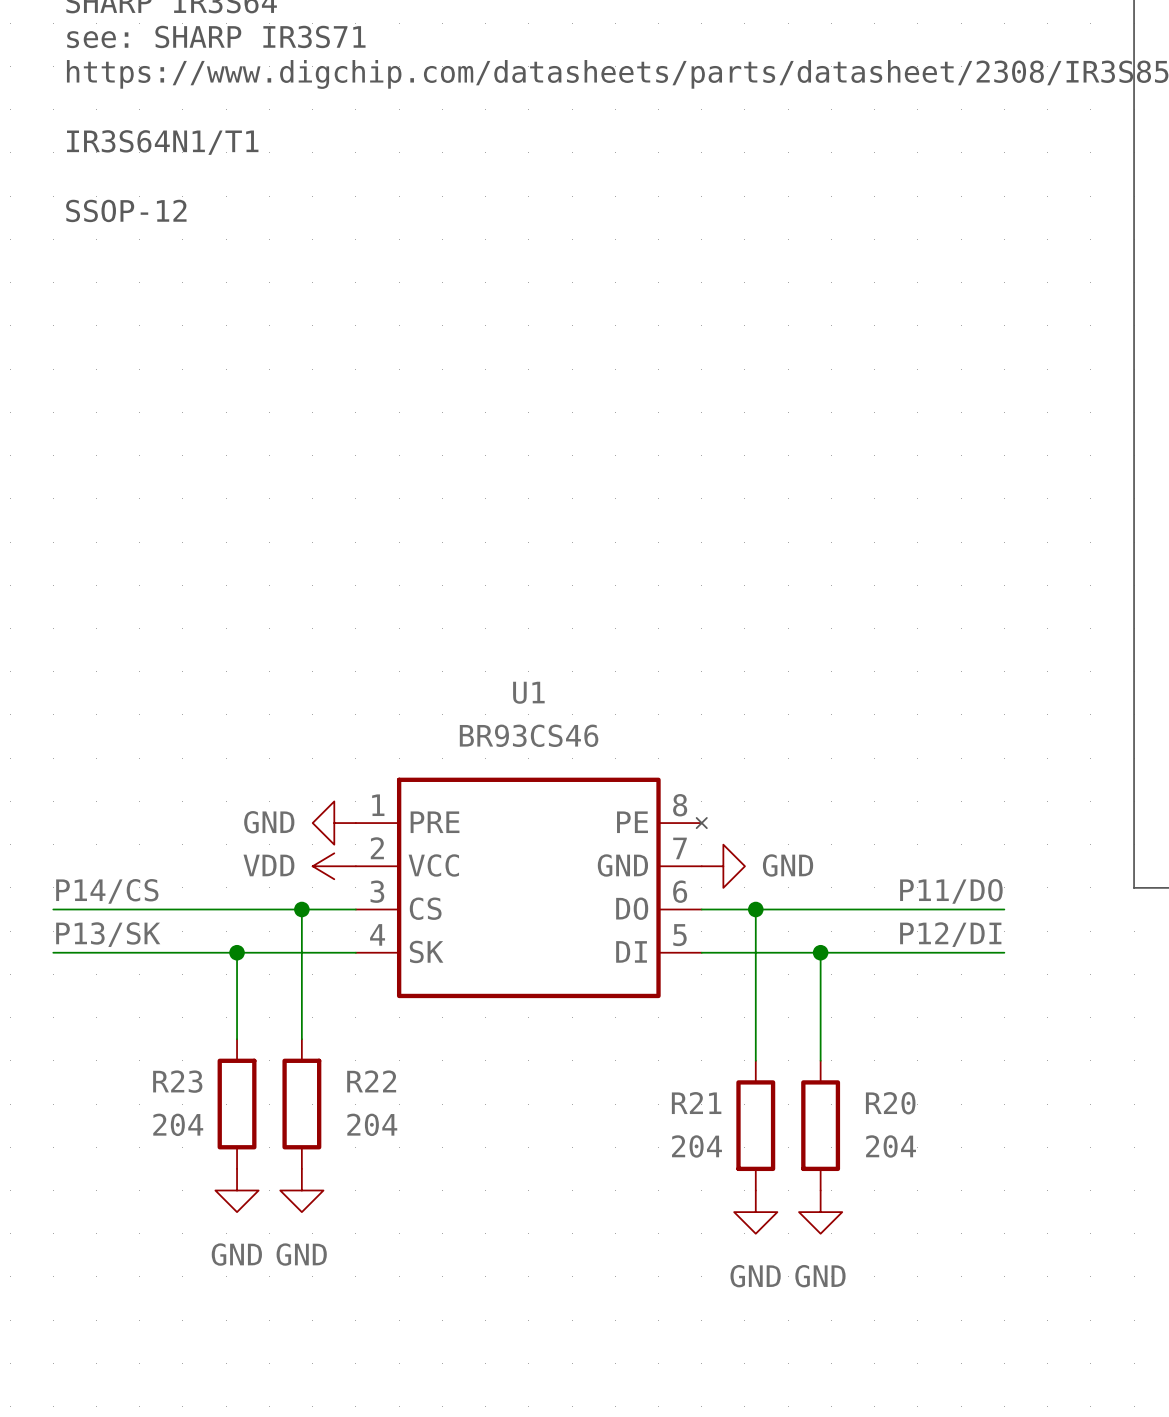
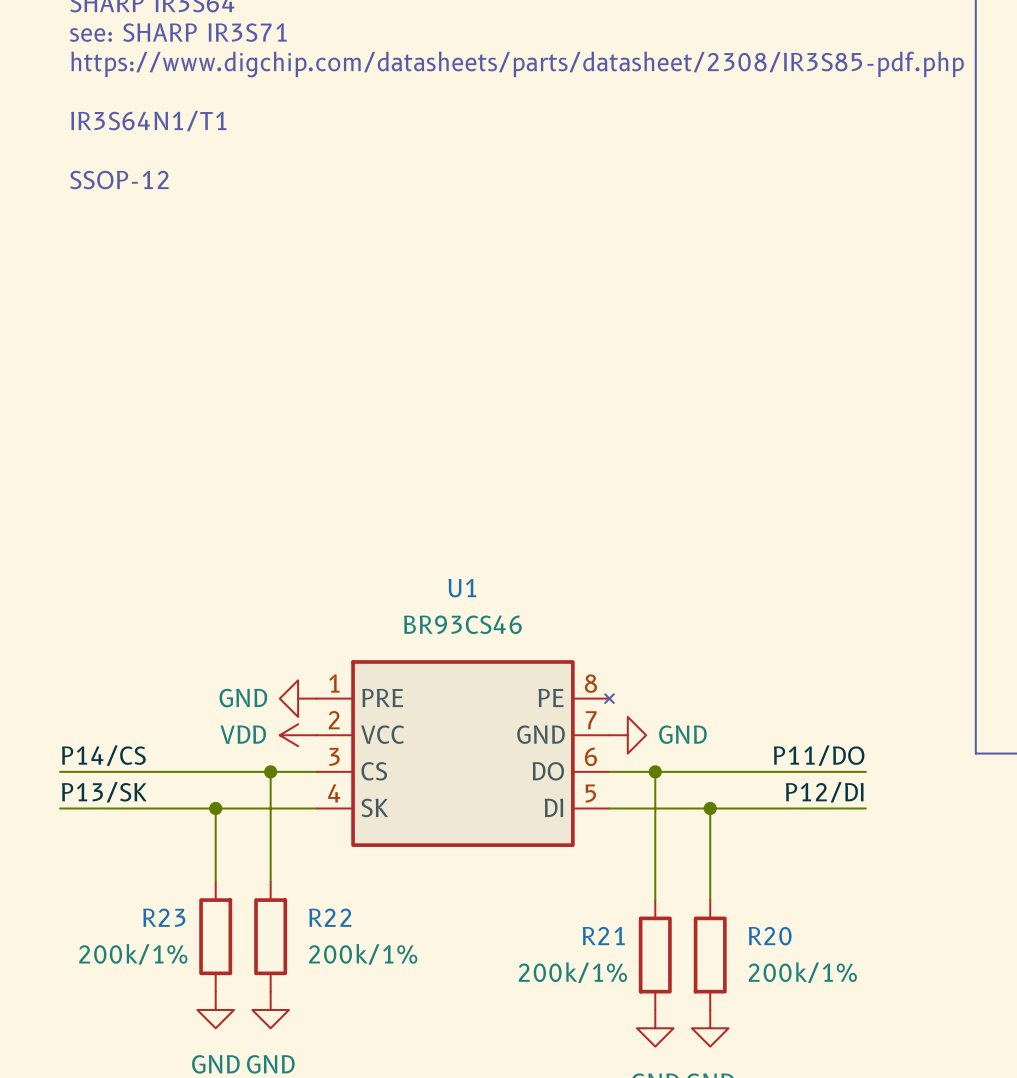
R23 value: 204 (178, 1124) -> 200k/1% (133, 954)
R22 value: 204 (372, 1124) -> 200k/1% (363, 954)
R21 value: 204 (696, 1146) -> 200k/1% (572, 972)
R20 value: 204 (891, 1146) -> 200k/1% (802, 972)

